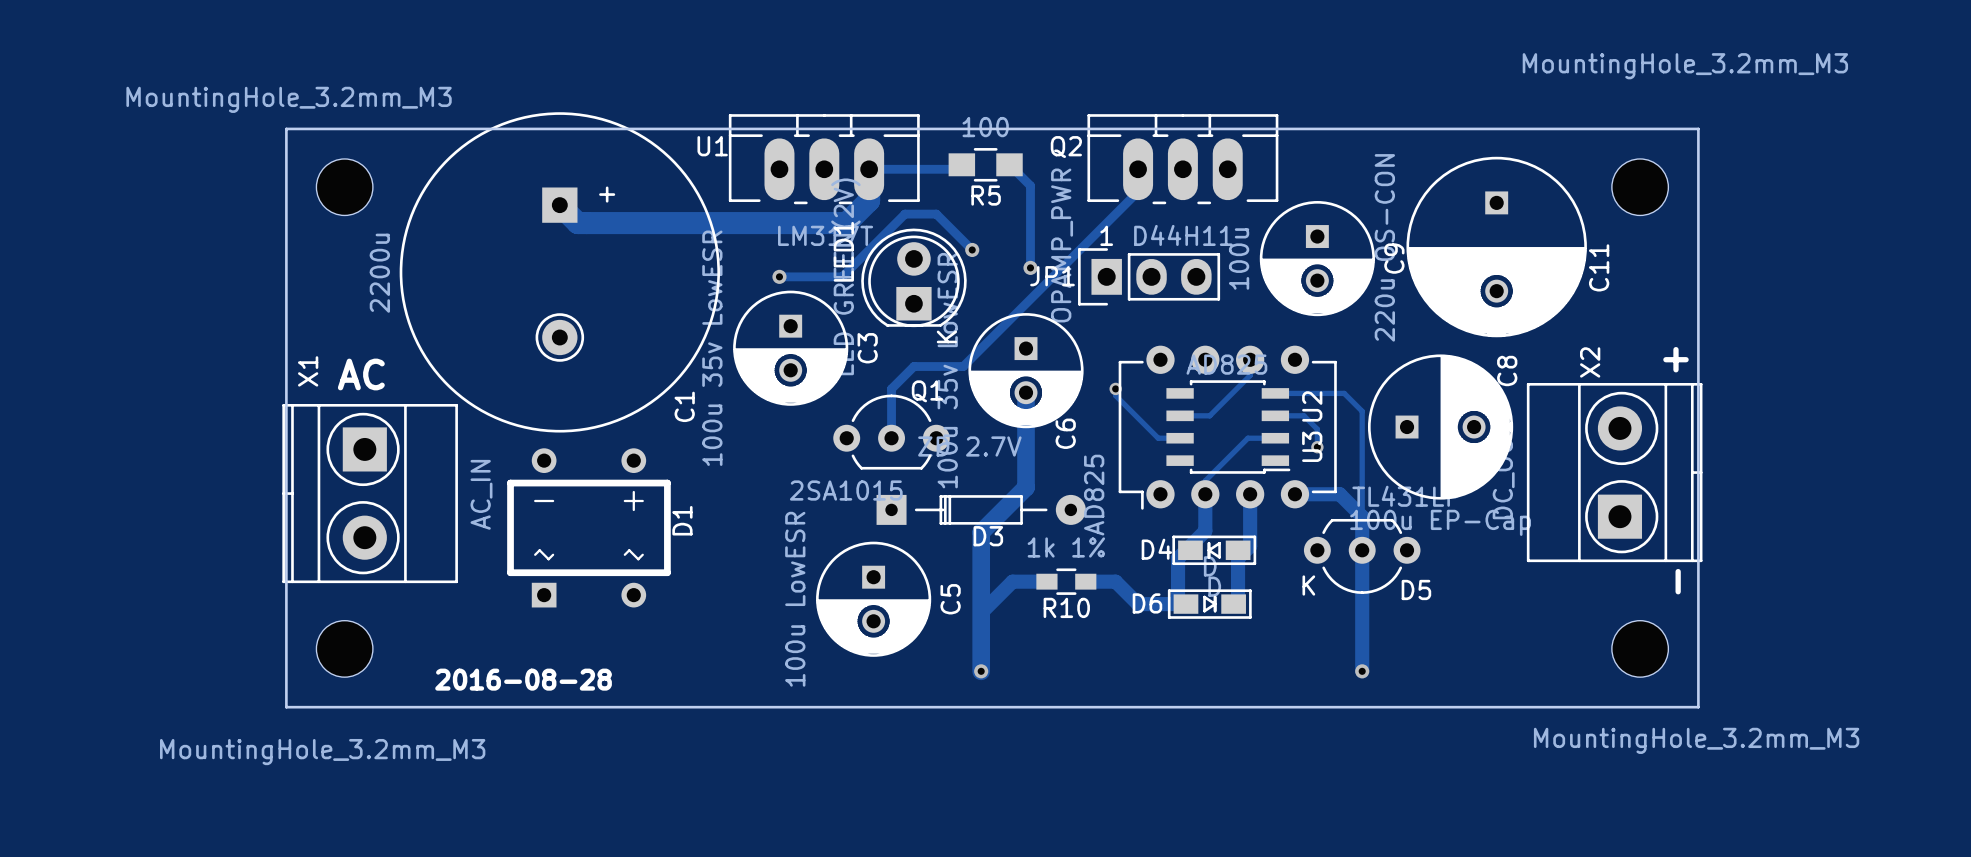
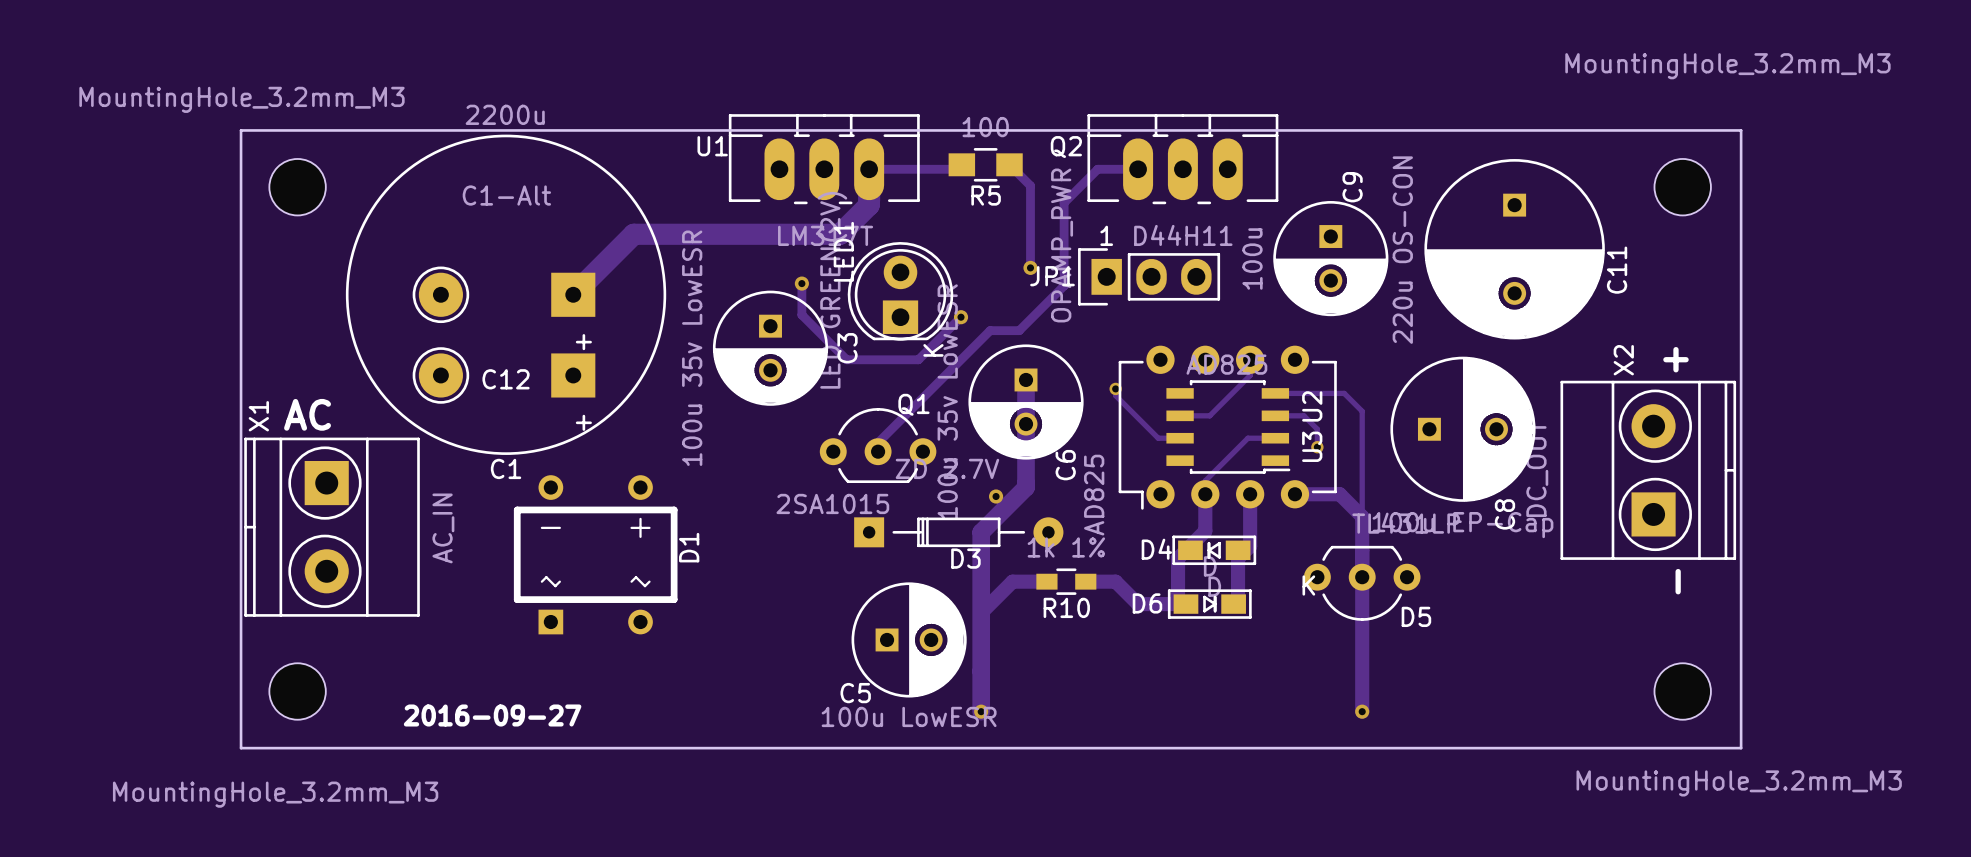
C1 footprint: [399, 112, 720, 433] -> [345, 134, 667, 455]
board edge: (286, 128) (286, 707) (1698, 707) (1698, 128) (286, 128) -> (241, 130) (241, 748) (1741, 748) (1741, 130) (241, 130)
track: none -> (1138, 169) (1097, 169) (1064, 202) (1064, 285) (1019, 330) (990, 330) (878, 442) (878, 451)
part position: (344, 187) -> (297, 187)
part position: (1640, 187) -> (1682, 187)
track: (1138, 191) (963, 366) (913, 366) (891, 388) (891, 438) -> none
track: (869, 200) (846, 223) (577, 223) (559, 205) -> (869, 200) (869, 205) (839, 234) (633, 234) (573, 294)
C11 position: (1496, 247) -> (1514, 249)
track: (972, 249) (936, 214) (904, 214) (842, 276) (779, 276) -> none
via position: (972, 249) -> (961, 317)
C9 position: (1317, 258) -> (1330, 258)
C9 name position: C9 (1394, 258) -> C9 (1352, 187)
C1 value position: 2200u (379, 273) -> 2200u (505, 114)
via position: (779, 276) -> (801, 283)
LED1 position: (913, 277) -> (900, 291)
track: none -> (801, 283) (801, 314) (846, 359) (918, 359) (961, 317)
C3 position: (790, 348) -> (770, 348)
C6 position: (1026, 370) -> (1026, 402)
C8 name position: C8 (1507, 370) -> C8 (1504, 514)
X1 name position: X1 (308, 371) -> X1 (258, 416)
text position: AC (361, 374) -> AC (307, 414)
C12: none -> C1-Alt (503, 375)
C1 name position: C1 (684, 406) -> C1 (506, 468)
C8 position: (1440, 427) -> (1462, 429)
Q1 position: (891, 432) -> (878, 445)
X2 position: (1614, 472) -> (1648, 470)
X1 position: (370, 493) -> (332, 527)
via: none -> (996, 496)
D3 position: (981, 509) -> (958, 532)
D1 position: (588, 527) -> (595, 554)
D5 position: (1362, 556) -> (1362, 583)
C5 rotation: 0° (873, 599) -> 90° counterclockwise (909, 639)
C5 name position: C5 (950, 599) -> C5 (855, 693)
part position: (344, 648) -> (297, 691)
part position: (1640, 648) -> (1682, 691)
track: none -> (981, 671) (981, 711)
via position: (981, 671) -> (981, 711)
track: none -> (1362, 671) (1362, 711)
via position: (1362, 671) -> (1362, 711)
text: 2016-08-28 (523, 679) -> 2016-09-27 (492, 715)

